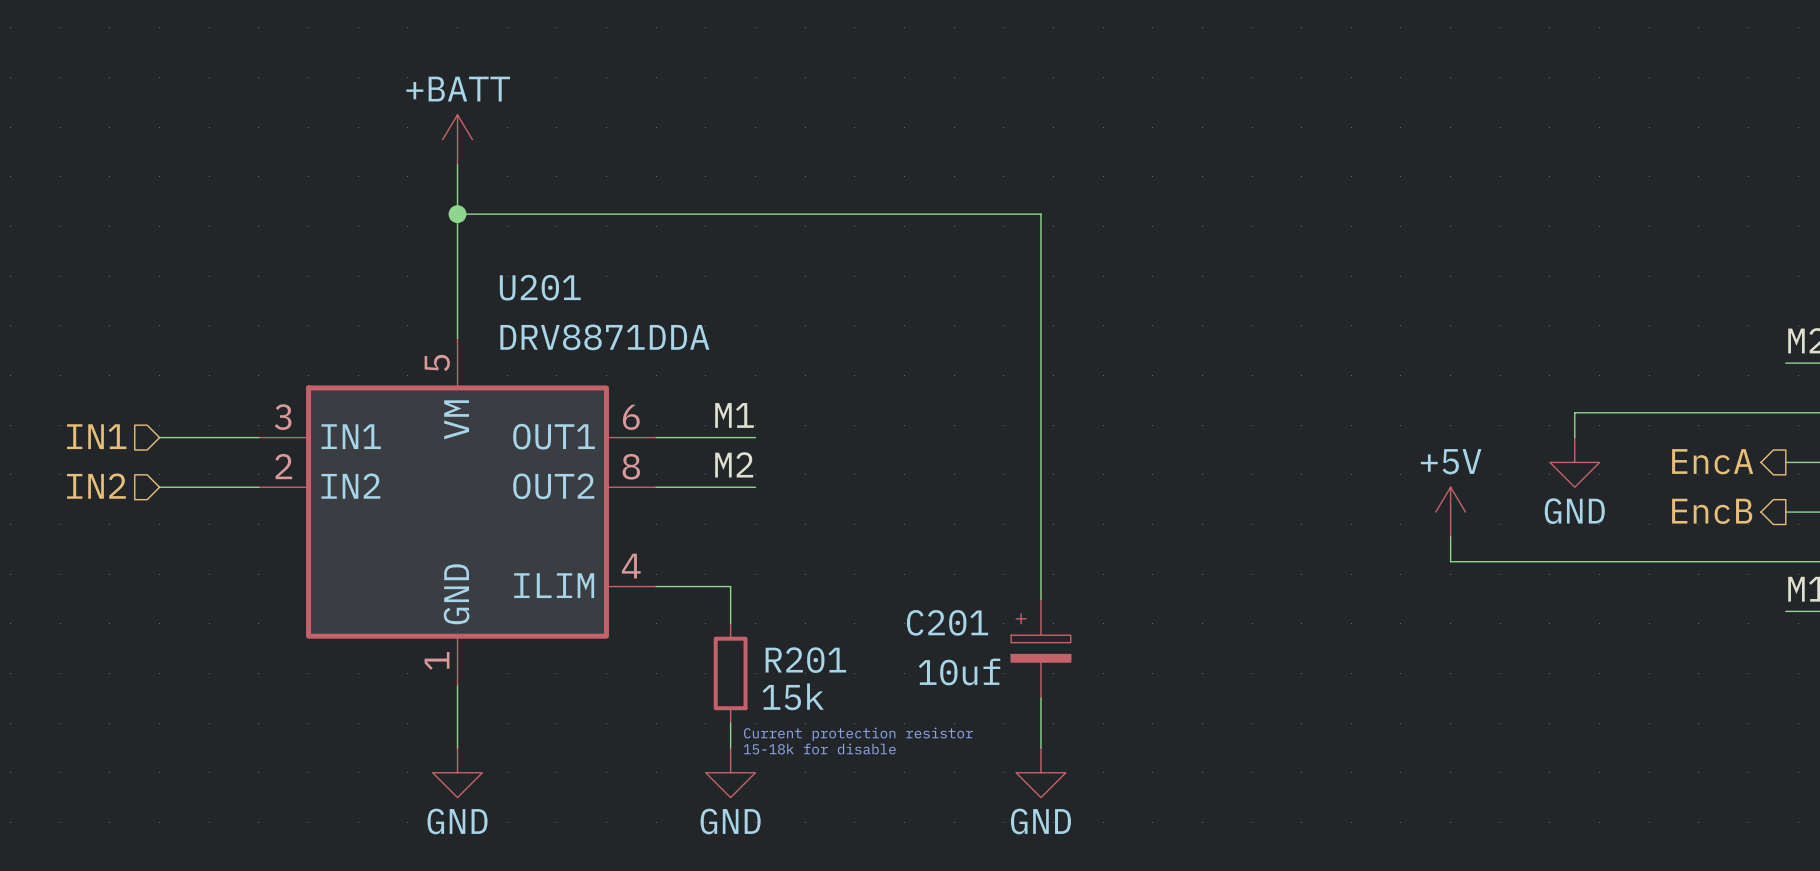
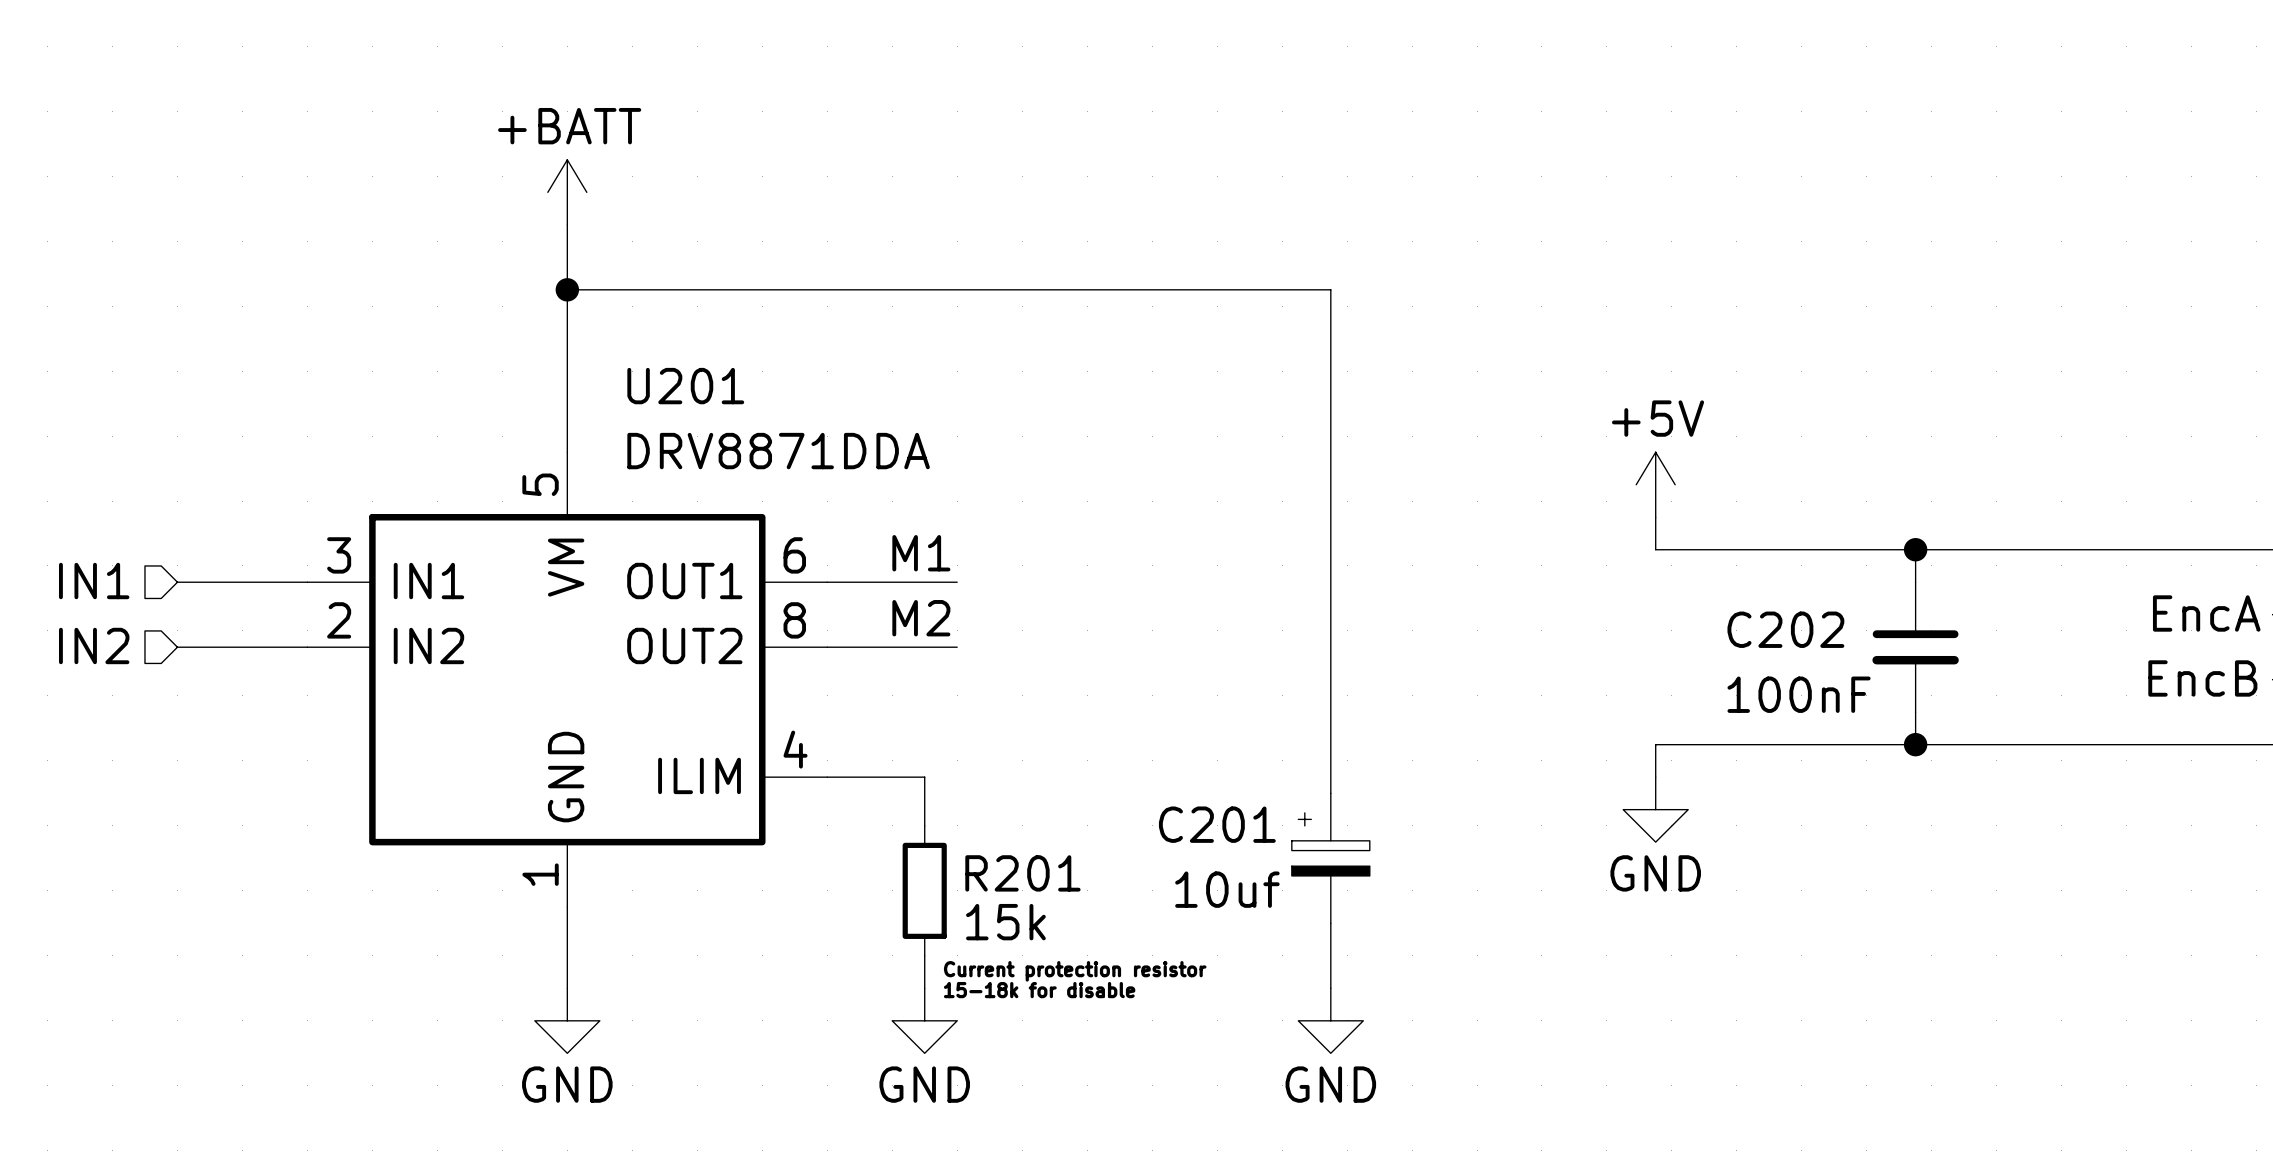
wire: none -> (1915, 549) (1915, 582)
junction: none -> (1915, 549)
wire: (1574, 412) (1574, 437) -> (2029, 549) (1655, 549) (1655, 517)
power symbol position: GND (1574, 462) -> GND (1655, 809)
C202: none -> 100nF (1915, 647)
power symbol position: +5V (1450, 512) -> +5V (1655, 484)
wire: (1450, 536) (1450, 561) -> (1655, 777) (1655, 744) (1866, 744)
wire: none -> (1915, 712) (1915, 744)
junction: none -> (1915, 744)

